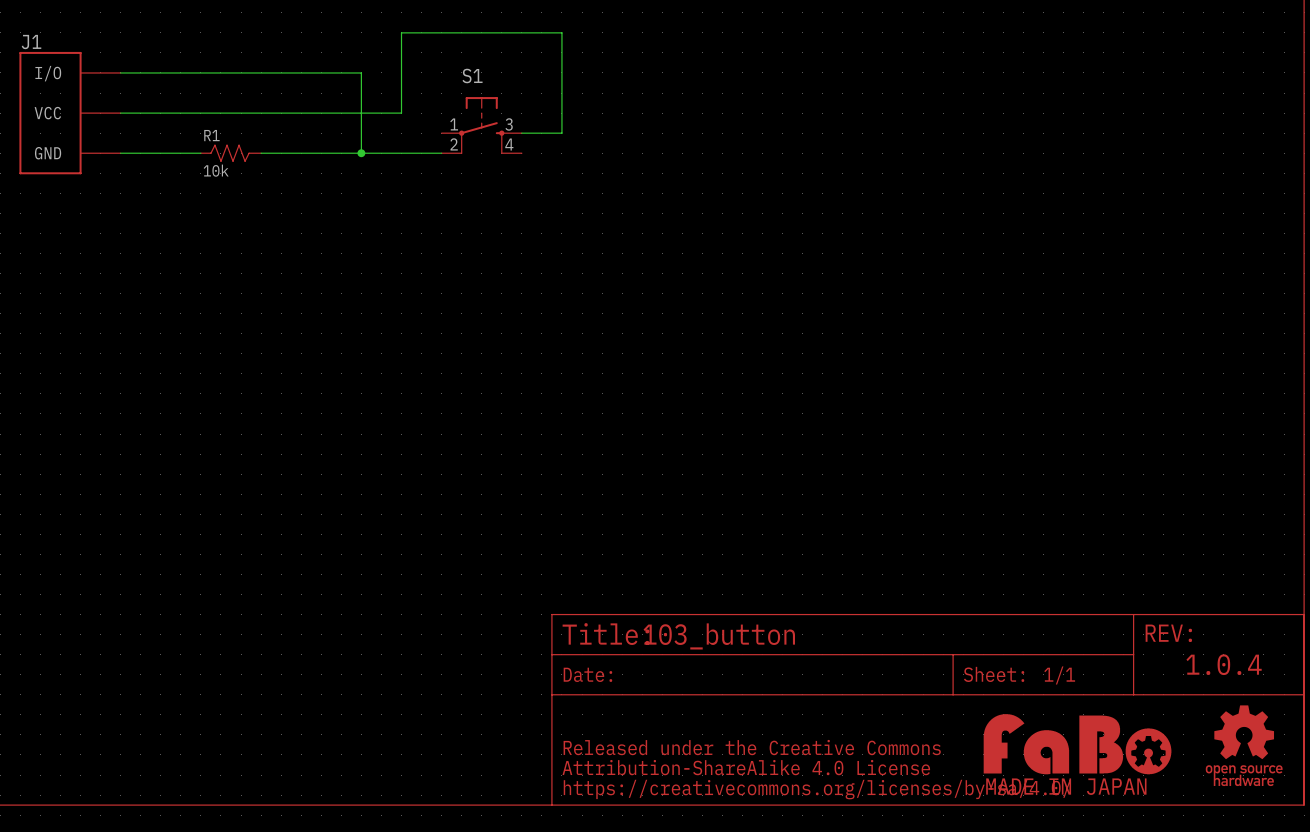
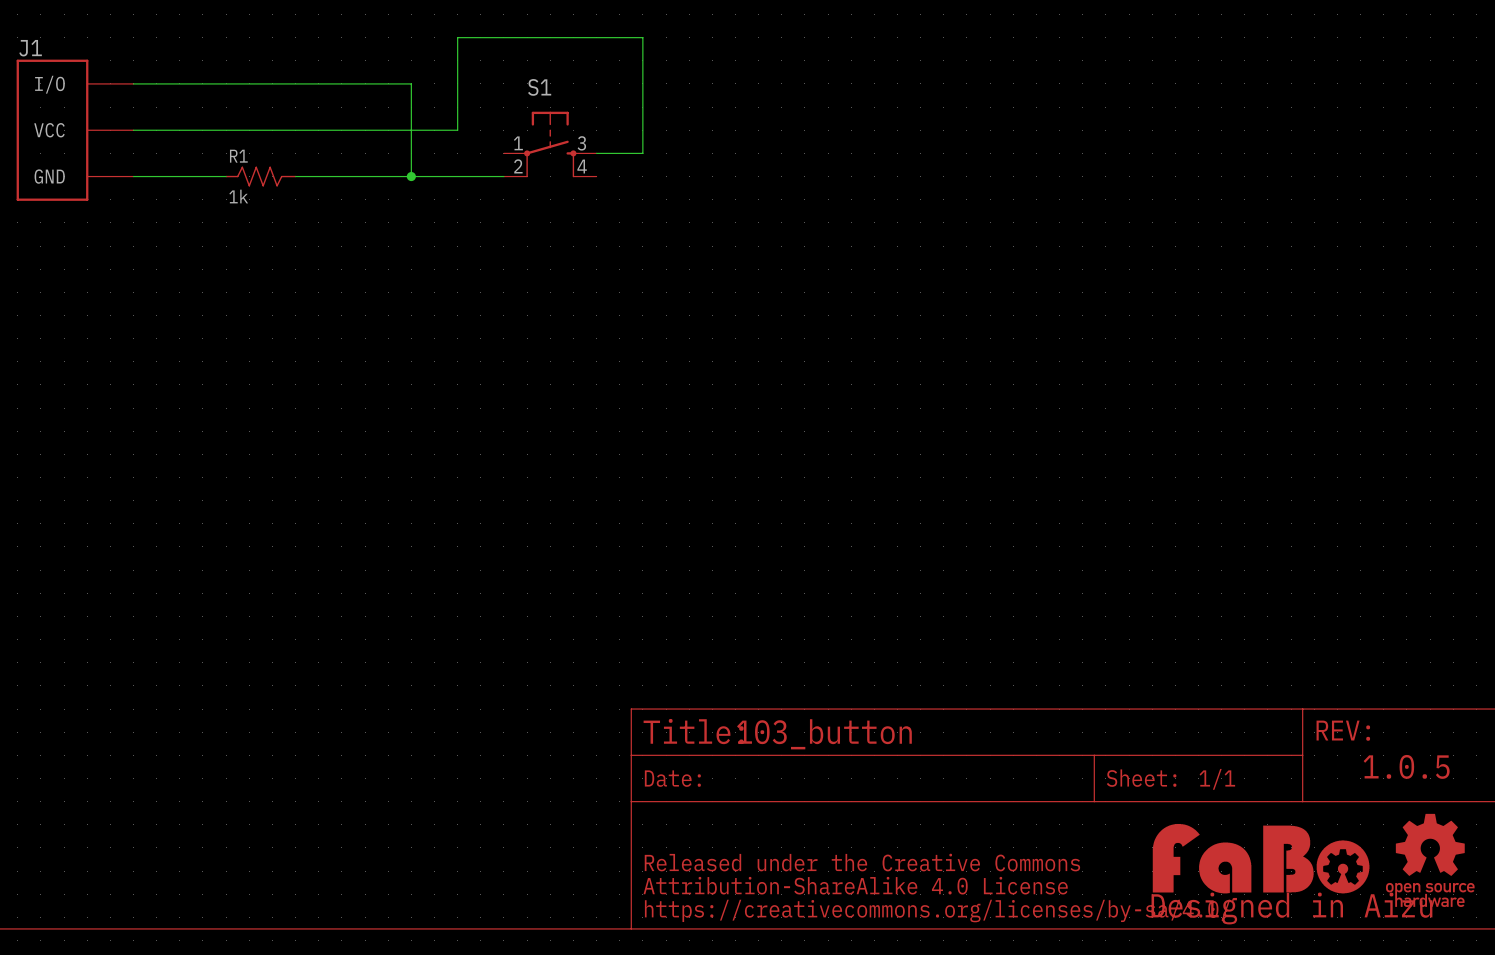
R1 value: 10k (216, 170) -> 1k (238, 196)
text: 1.0.4 (1224, 664) -> 1.0.5 (1406, 766)
part: (1077, 744) -> none
part: none -> (1261, 858)

